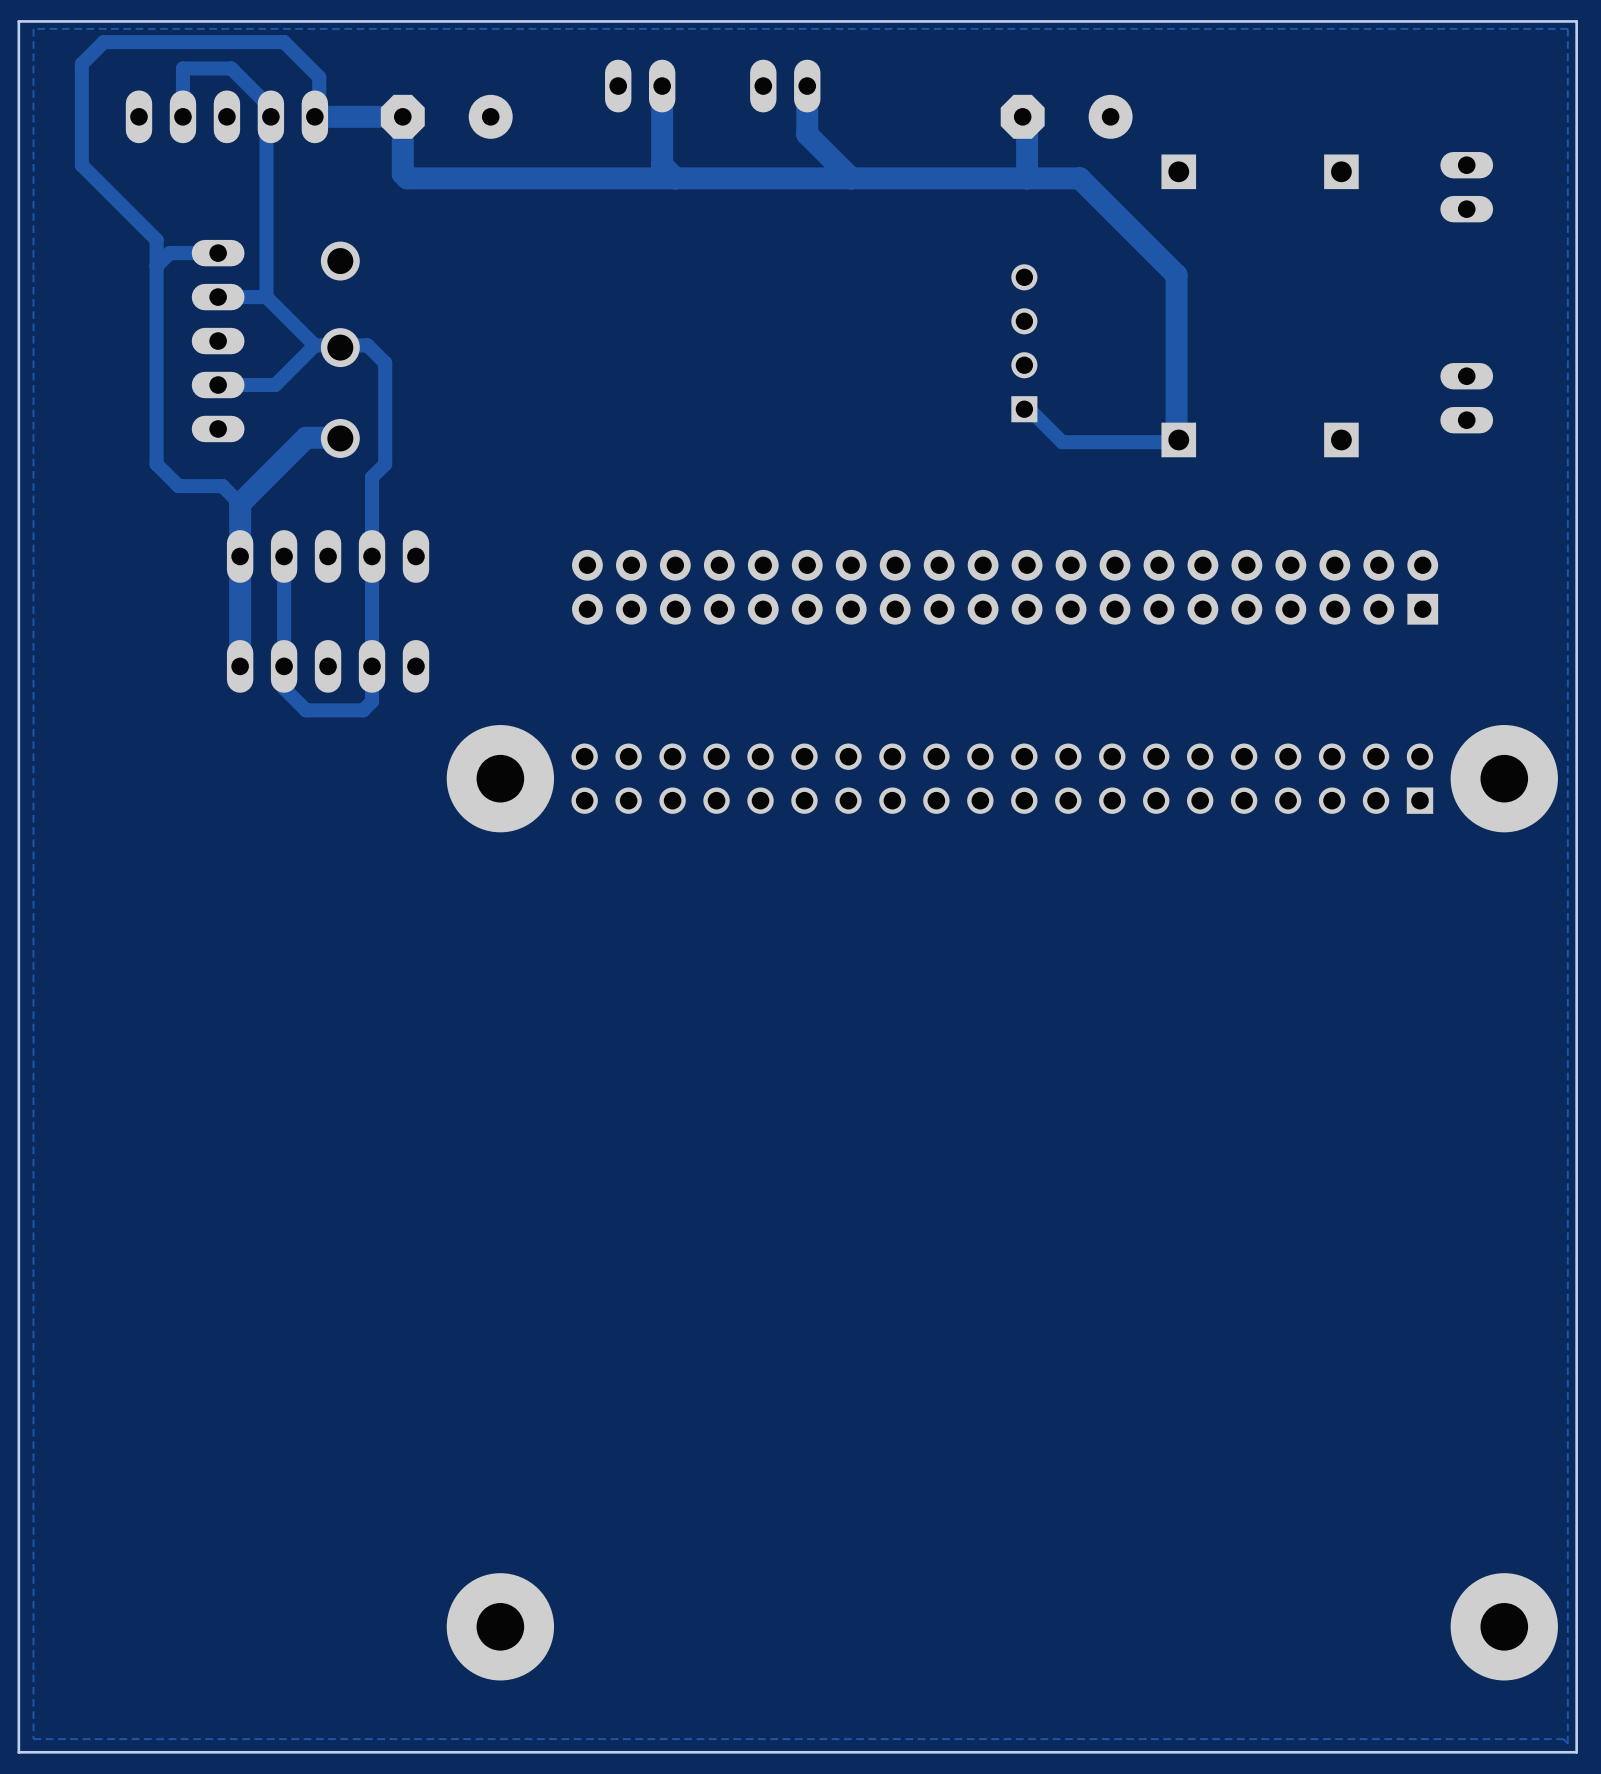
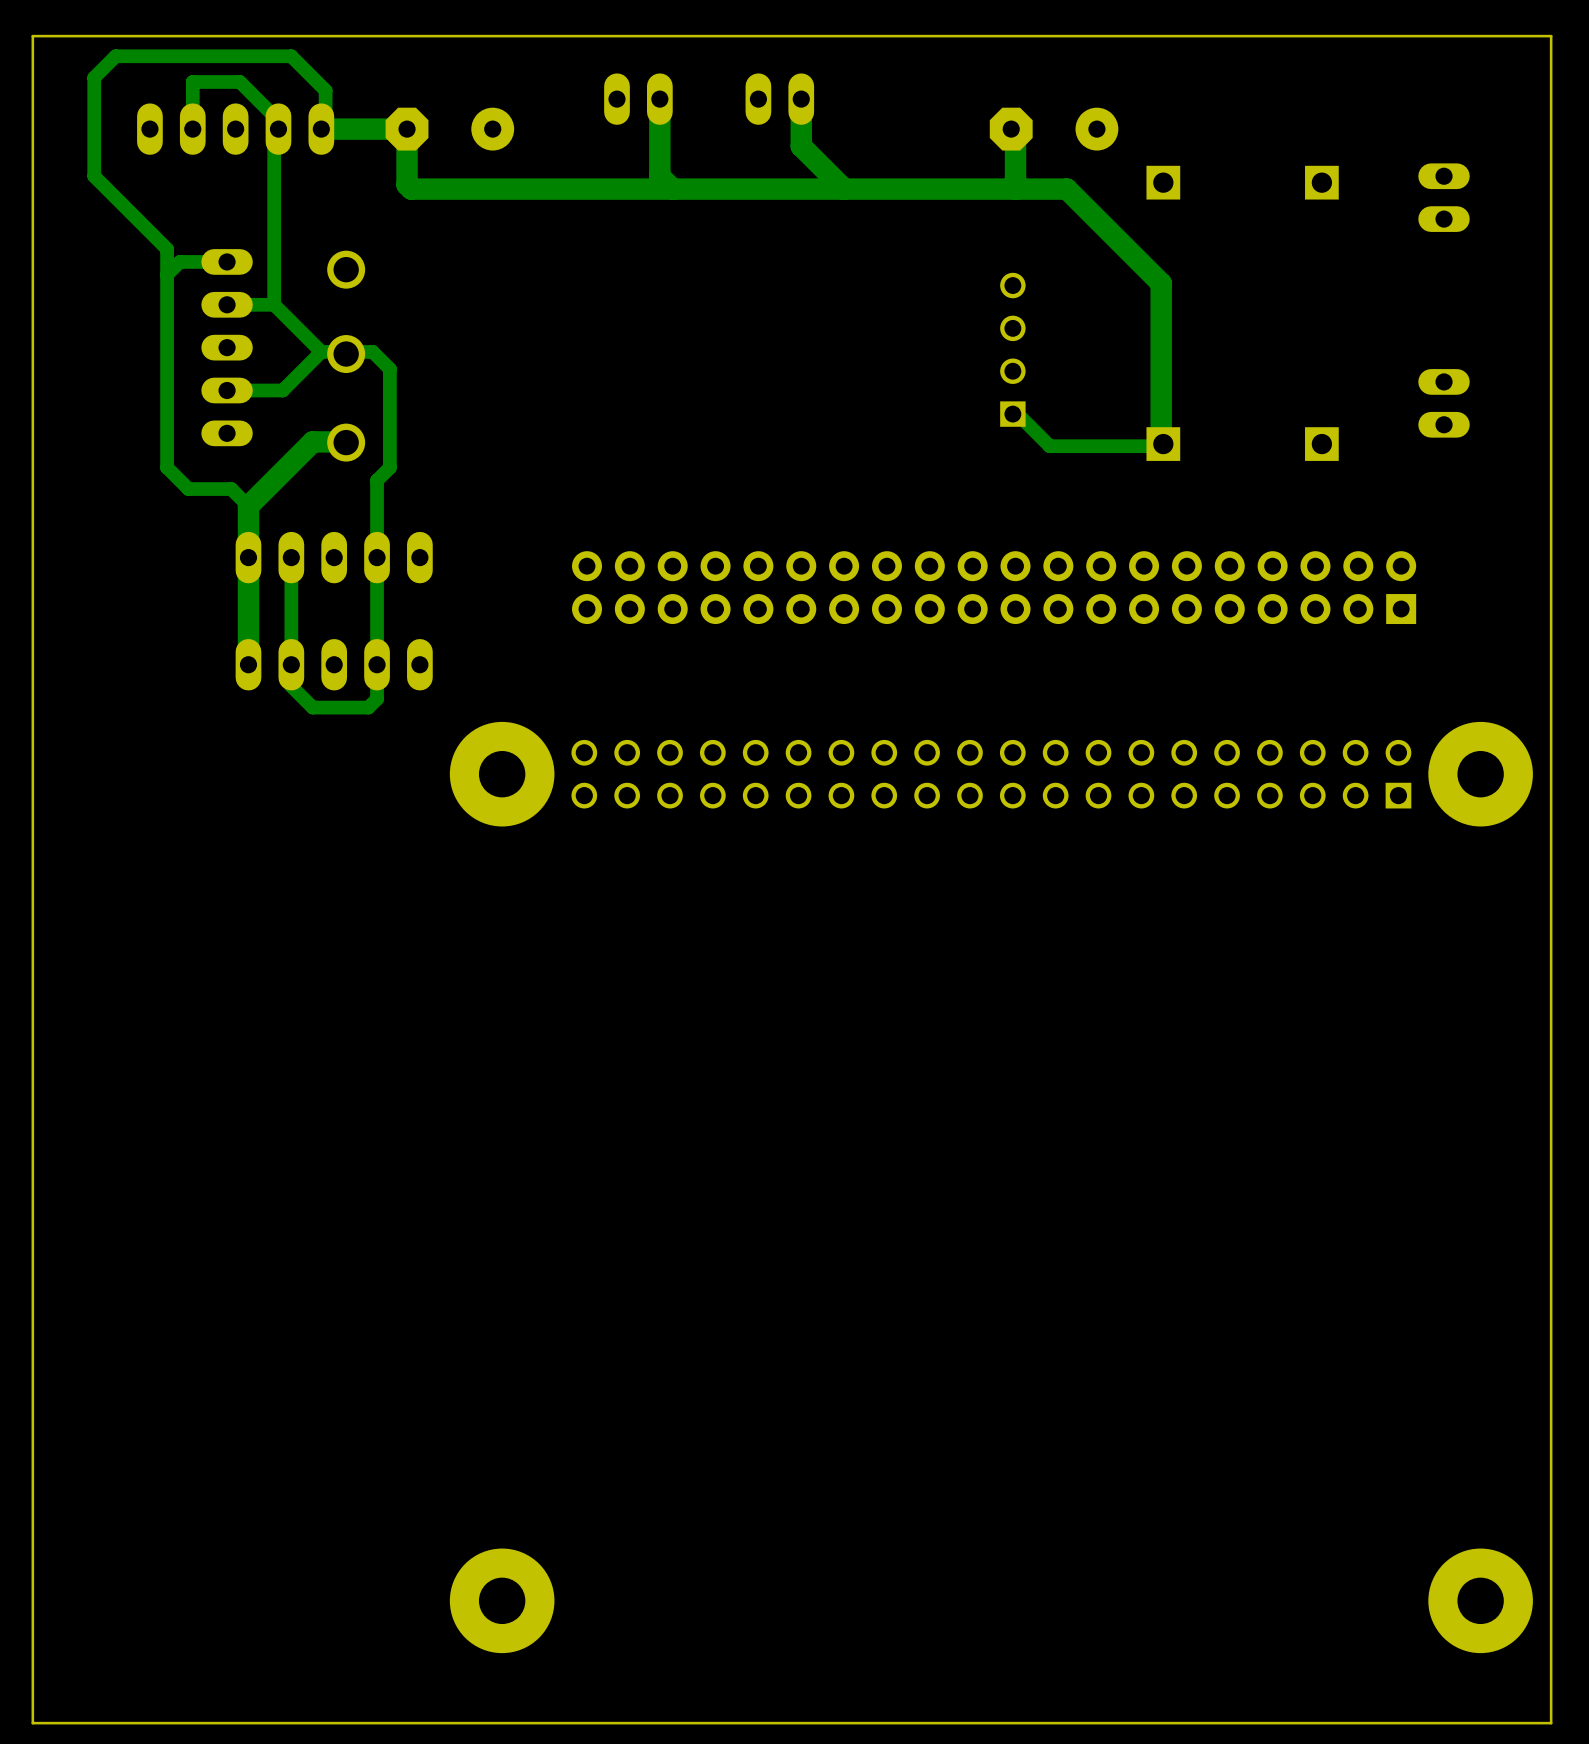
zone outline: (1567, 28) (33, 28) (33, 1739) (1563, 1739) (1567, 1743) (1567, 28) -> none

